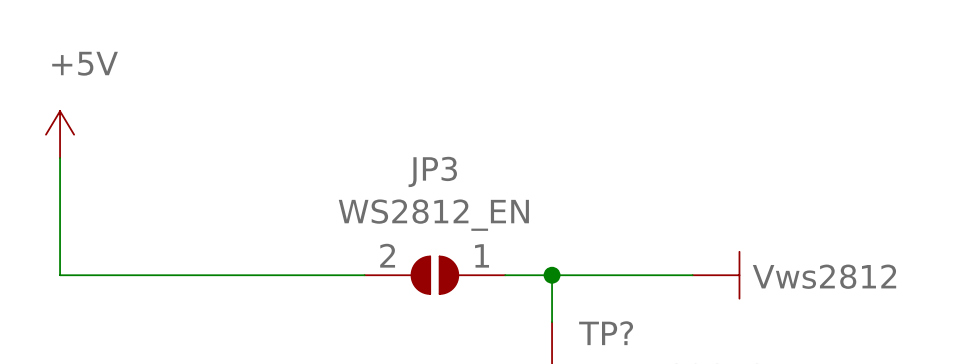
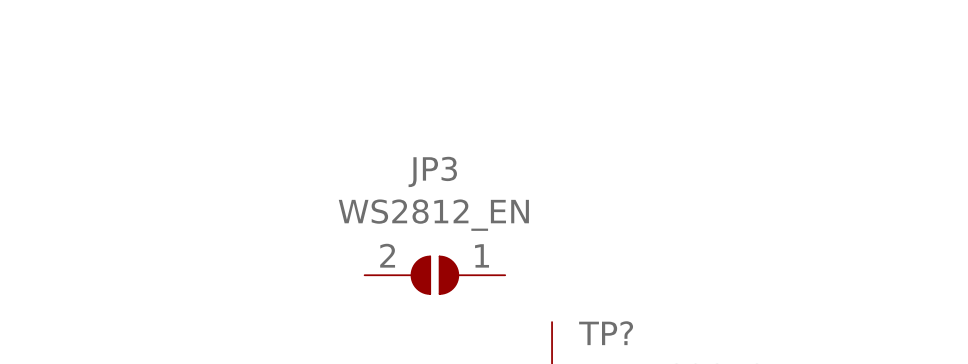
power symbol: +5V (60, 134) -> none
wire: (60, 158) (60, 275) (364, 275) -> none
wire: (505, 275) (692, 275) -> none
wire: (552, 275) (552, 322) -> none
junction: (552, 275) -> none
power symbol: Vws2812 (716, 275) -> none

